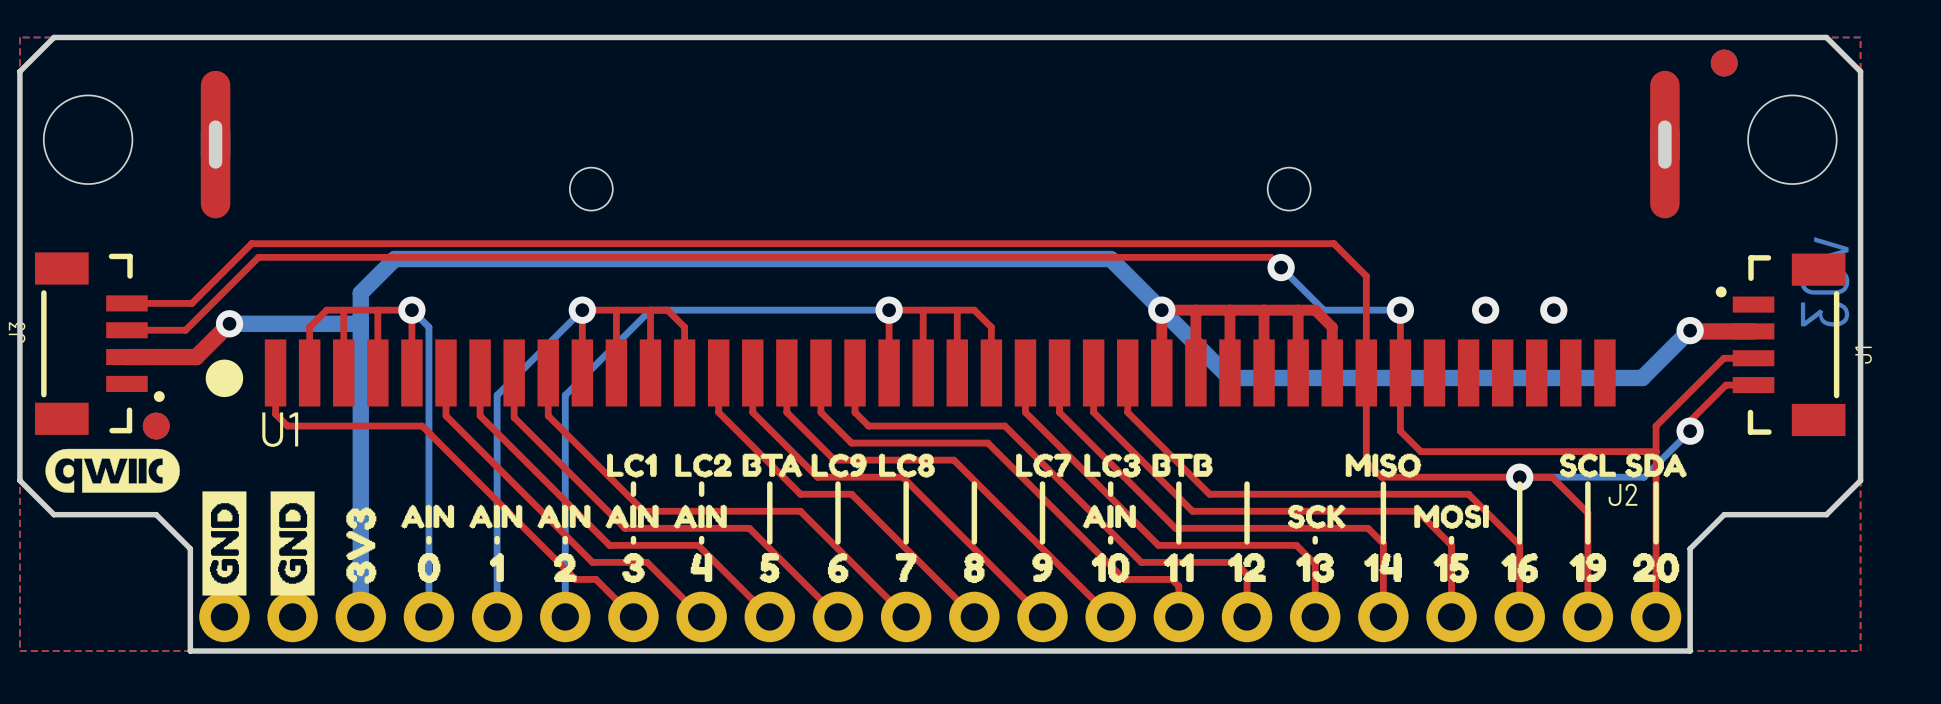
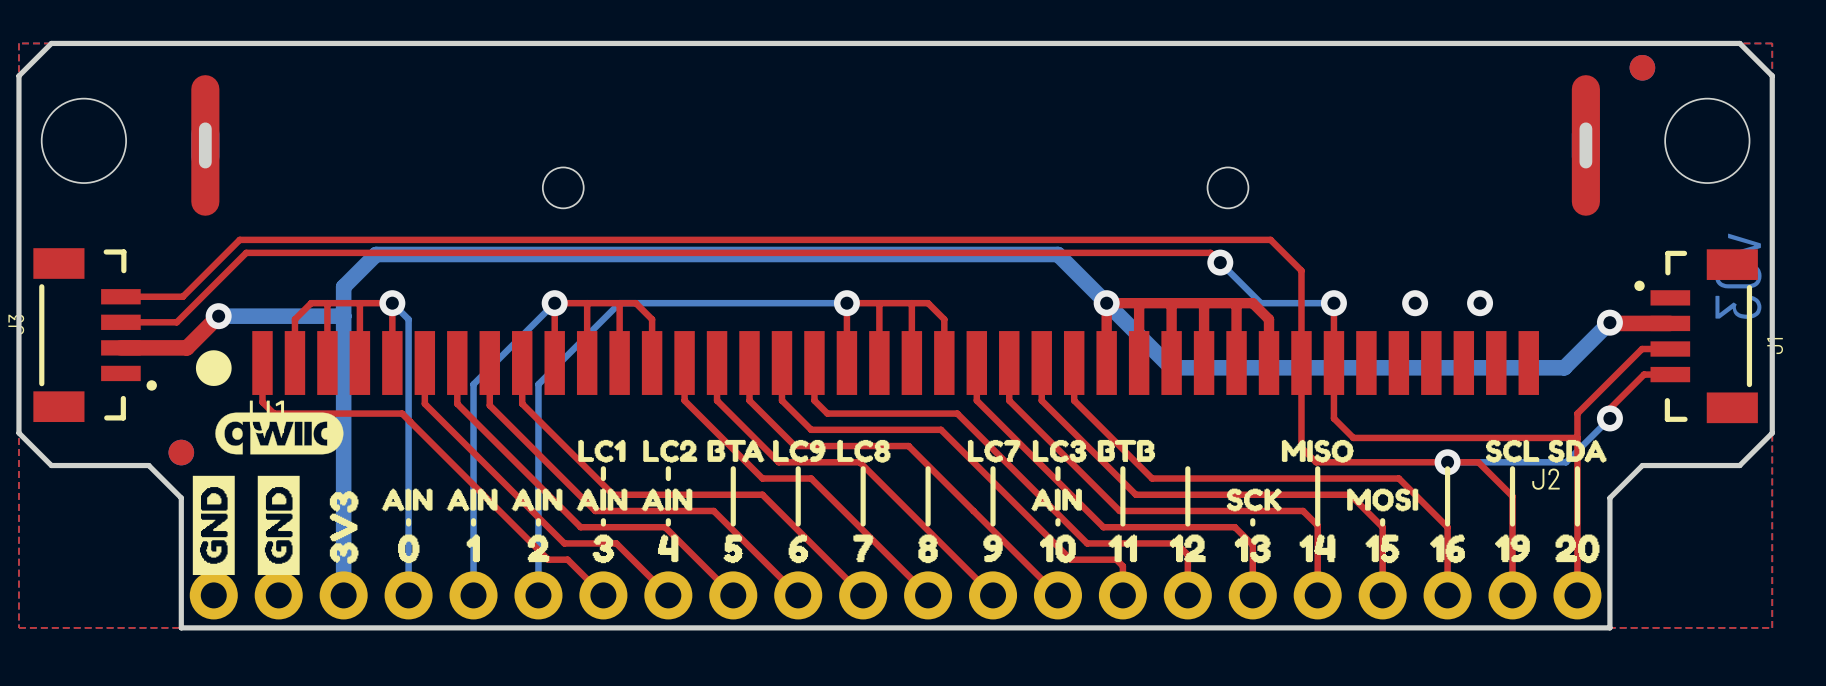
part position: (156, 426) -> (181, 452)
board edge: (19, 446) (19, 480) (54, 514) (156, 514) (190, 548) -> (18, 433) (51, 465) (148, 465) (181, 498) (181, 530)
board edge: (1860, 446) (1860, 480) (1826, 514) (1724, 514) (1690, 548) -> (1772, 433) (1739, 465) (1642, 465) (1609, 498) (1609, 530)
drawing position: (112, 470) -> (279, 433)

